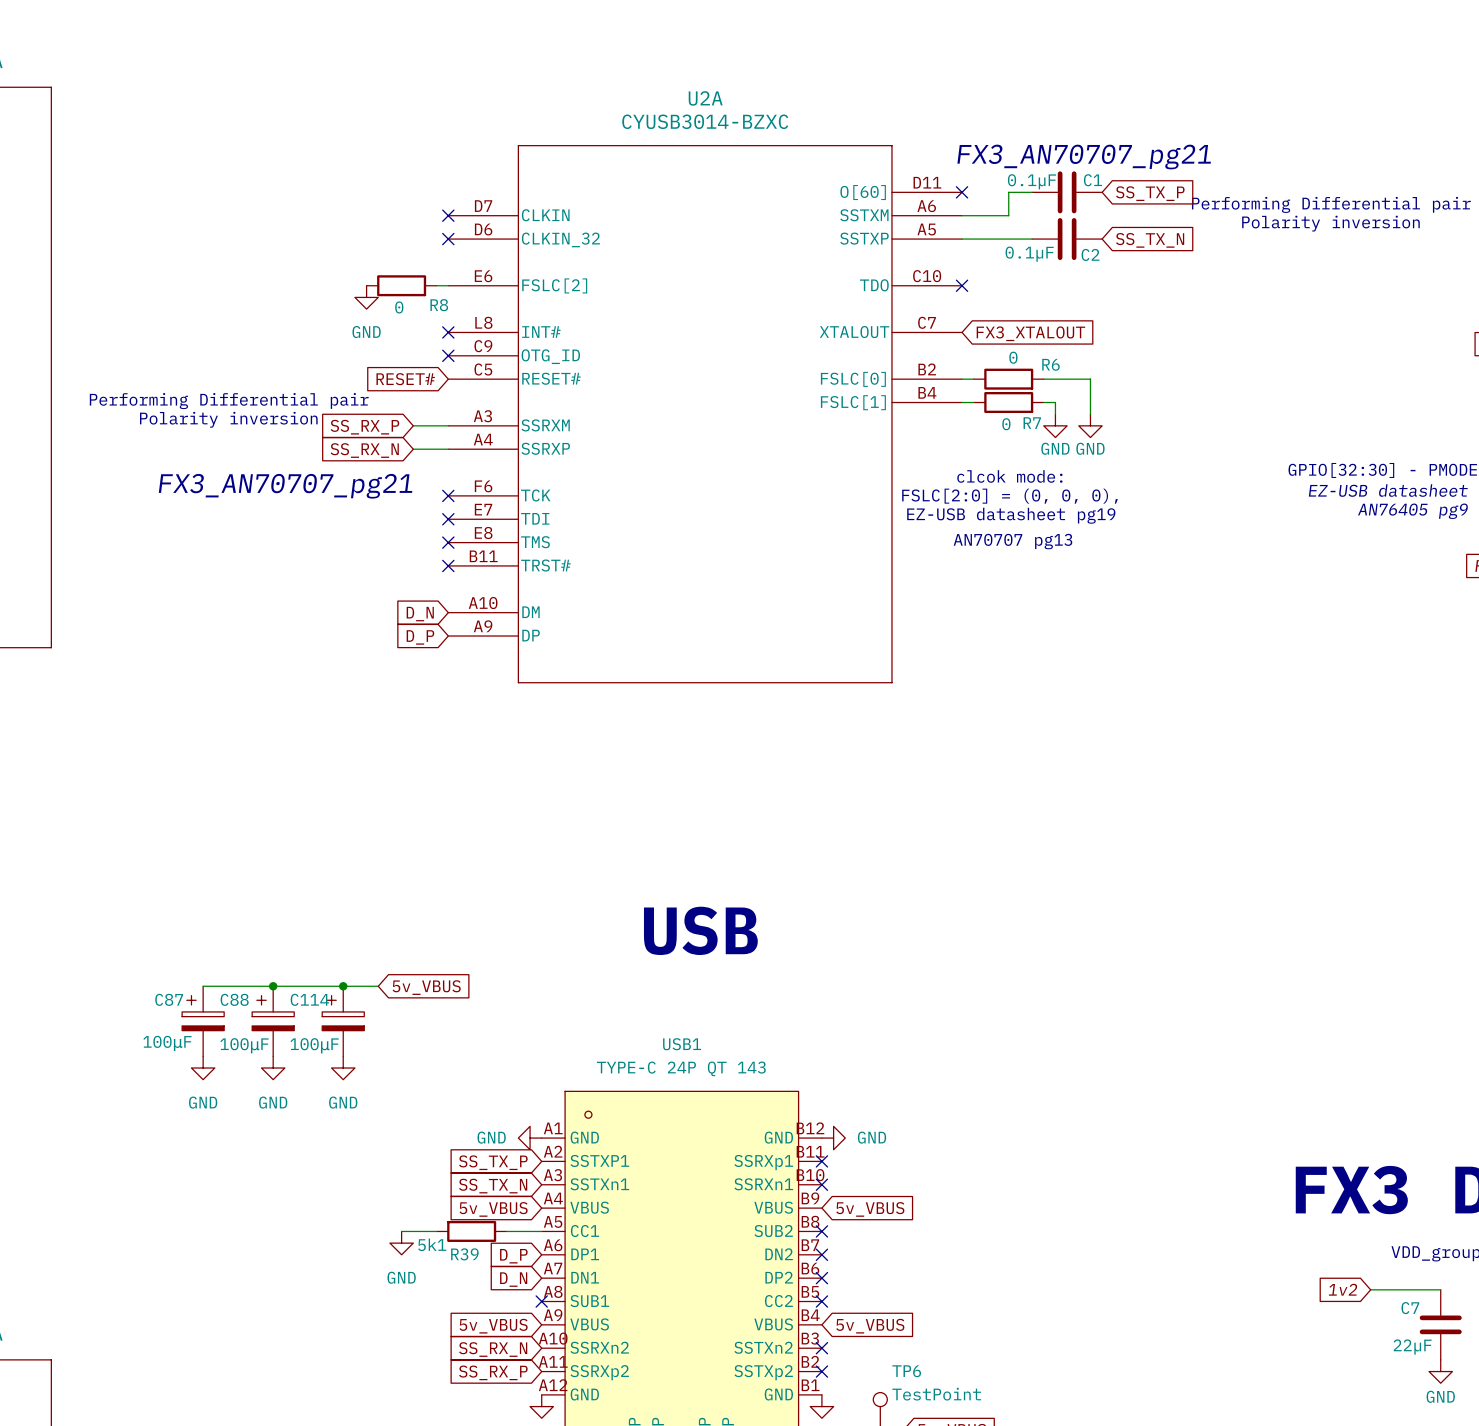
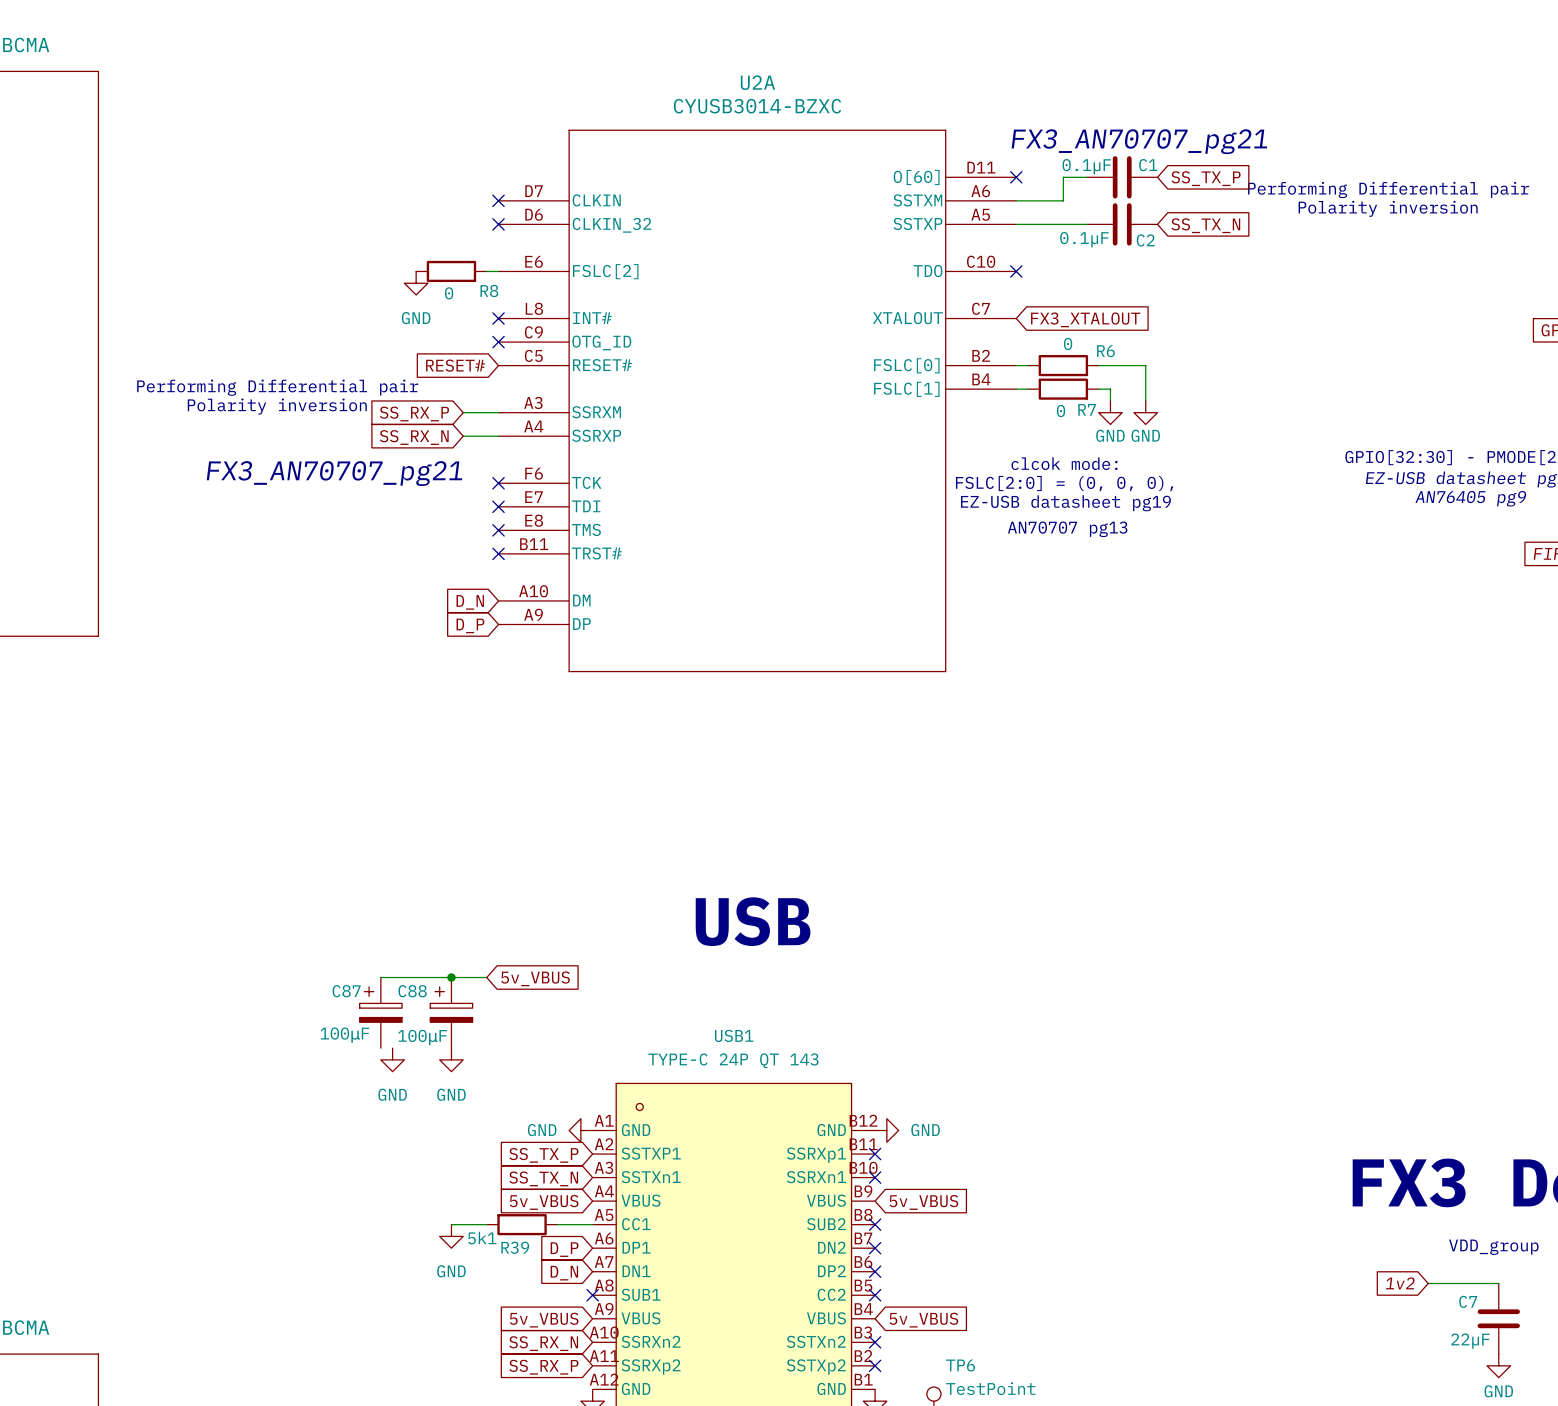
wire: (203, 986) (331, 986) -> none
junction: (273, 986) -> none
junction: (343, 986) -> none
wire: none -> (427, 977) (486, 977)
junction: none -> (451, 977)
global label position: 5v_VBUS (426, 987) -> 5v_VBUS (535, 978)
C87 position: (203, 1021) -> (380, 1012)
C88 position: (273, 1021) -> (451, 1012)
C114: 100μF (343, 1021) -> none
power symbol: GND (203, 1068) -> none
power symbol: GND (273, 1068) -> none
power symbol: none -> GND (451, 1059)

